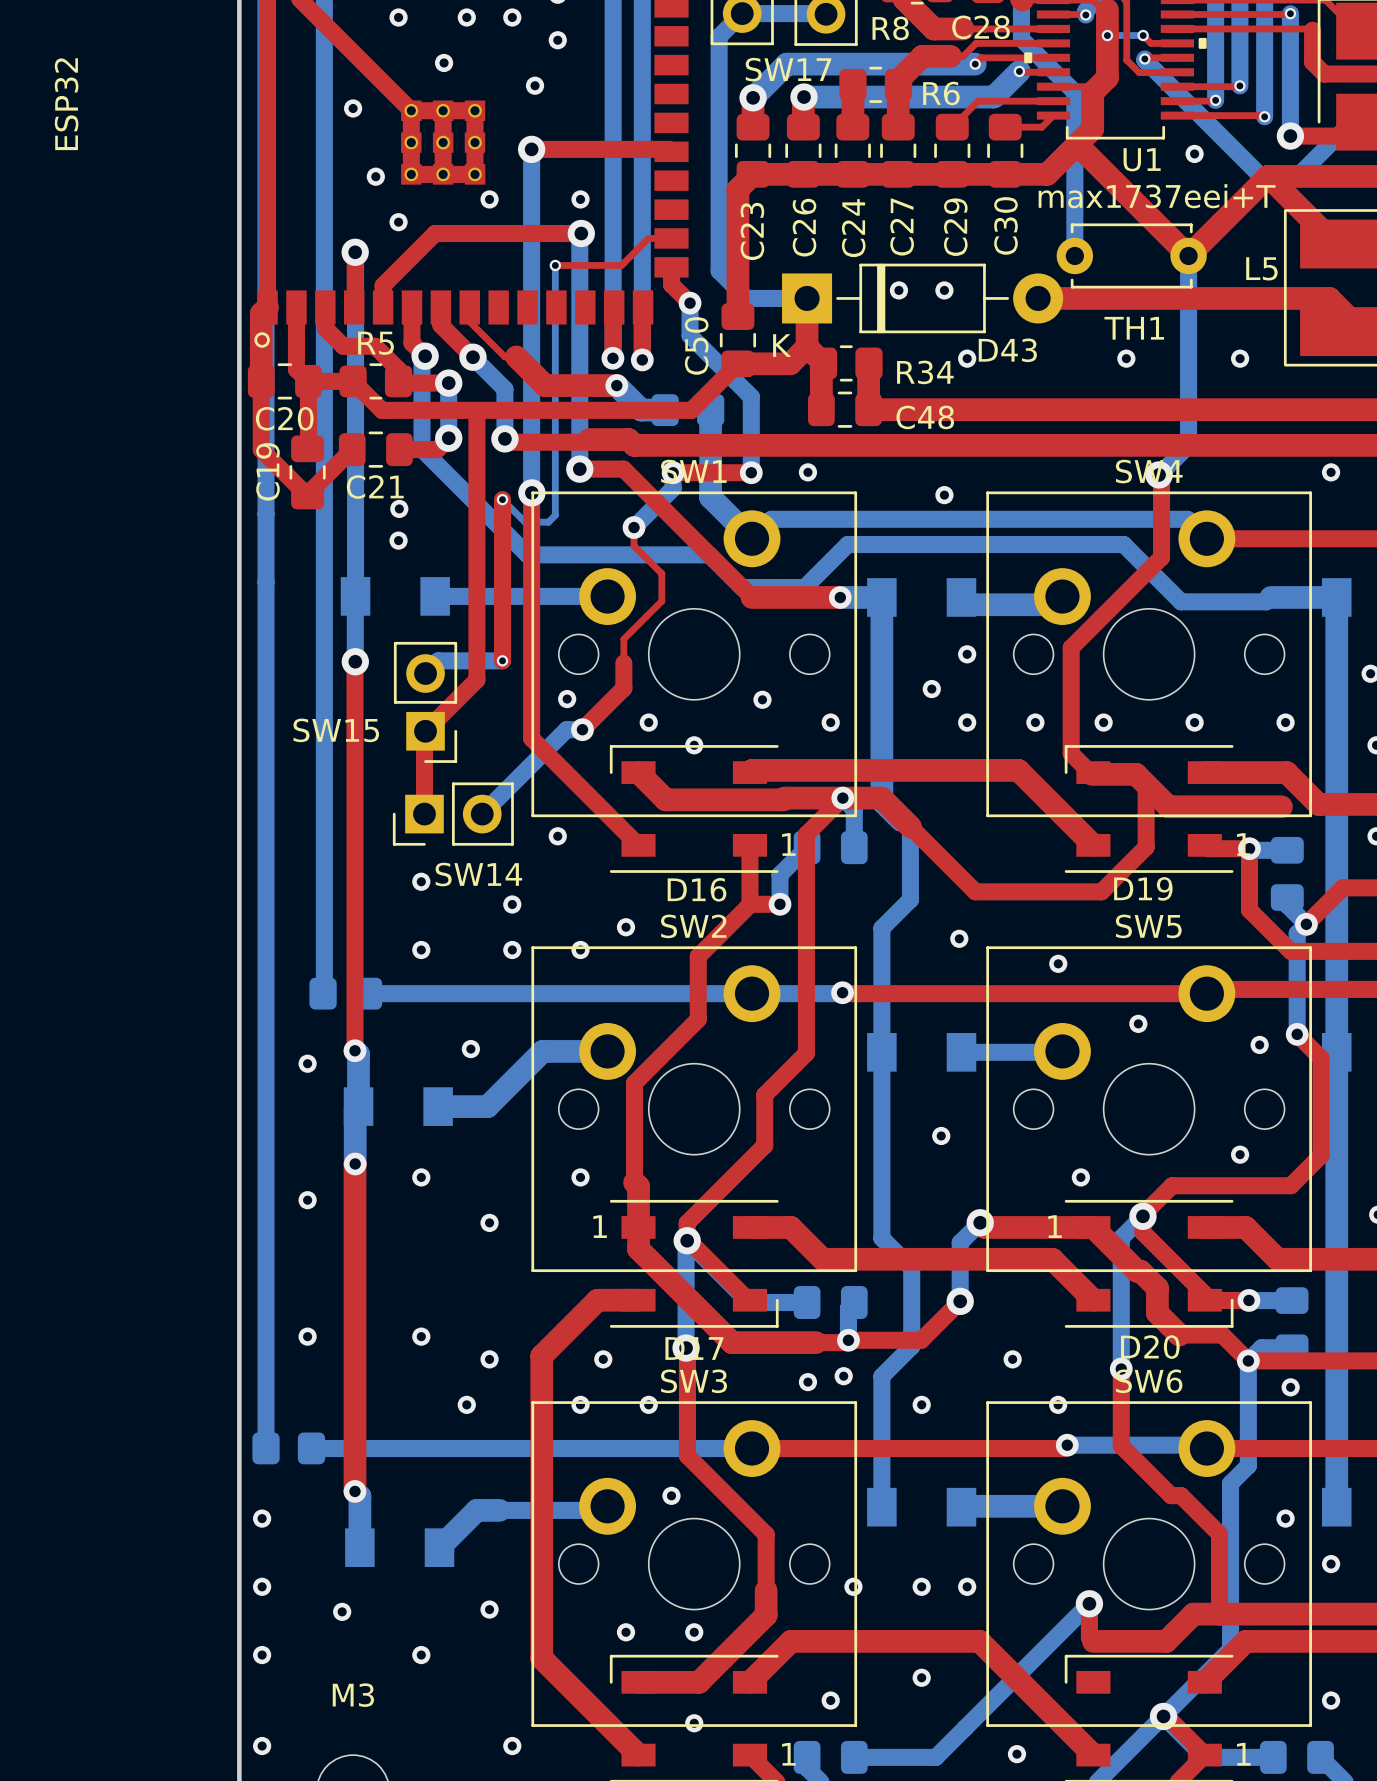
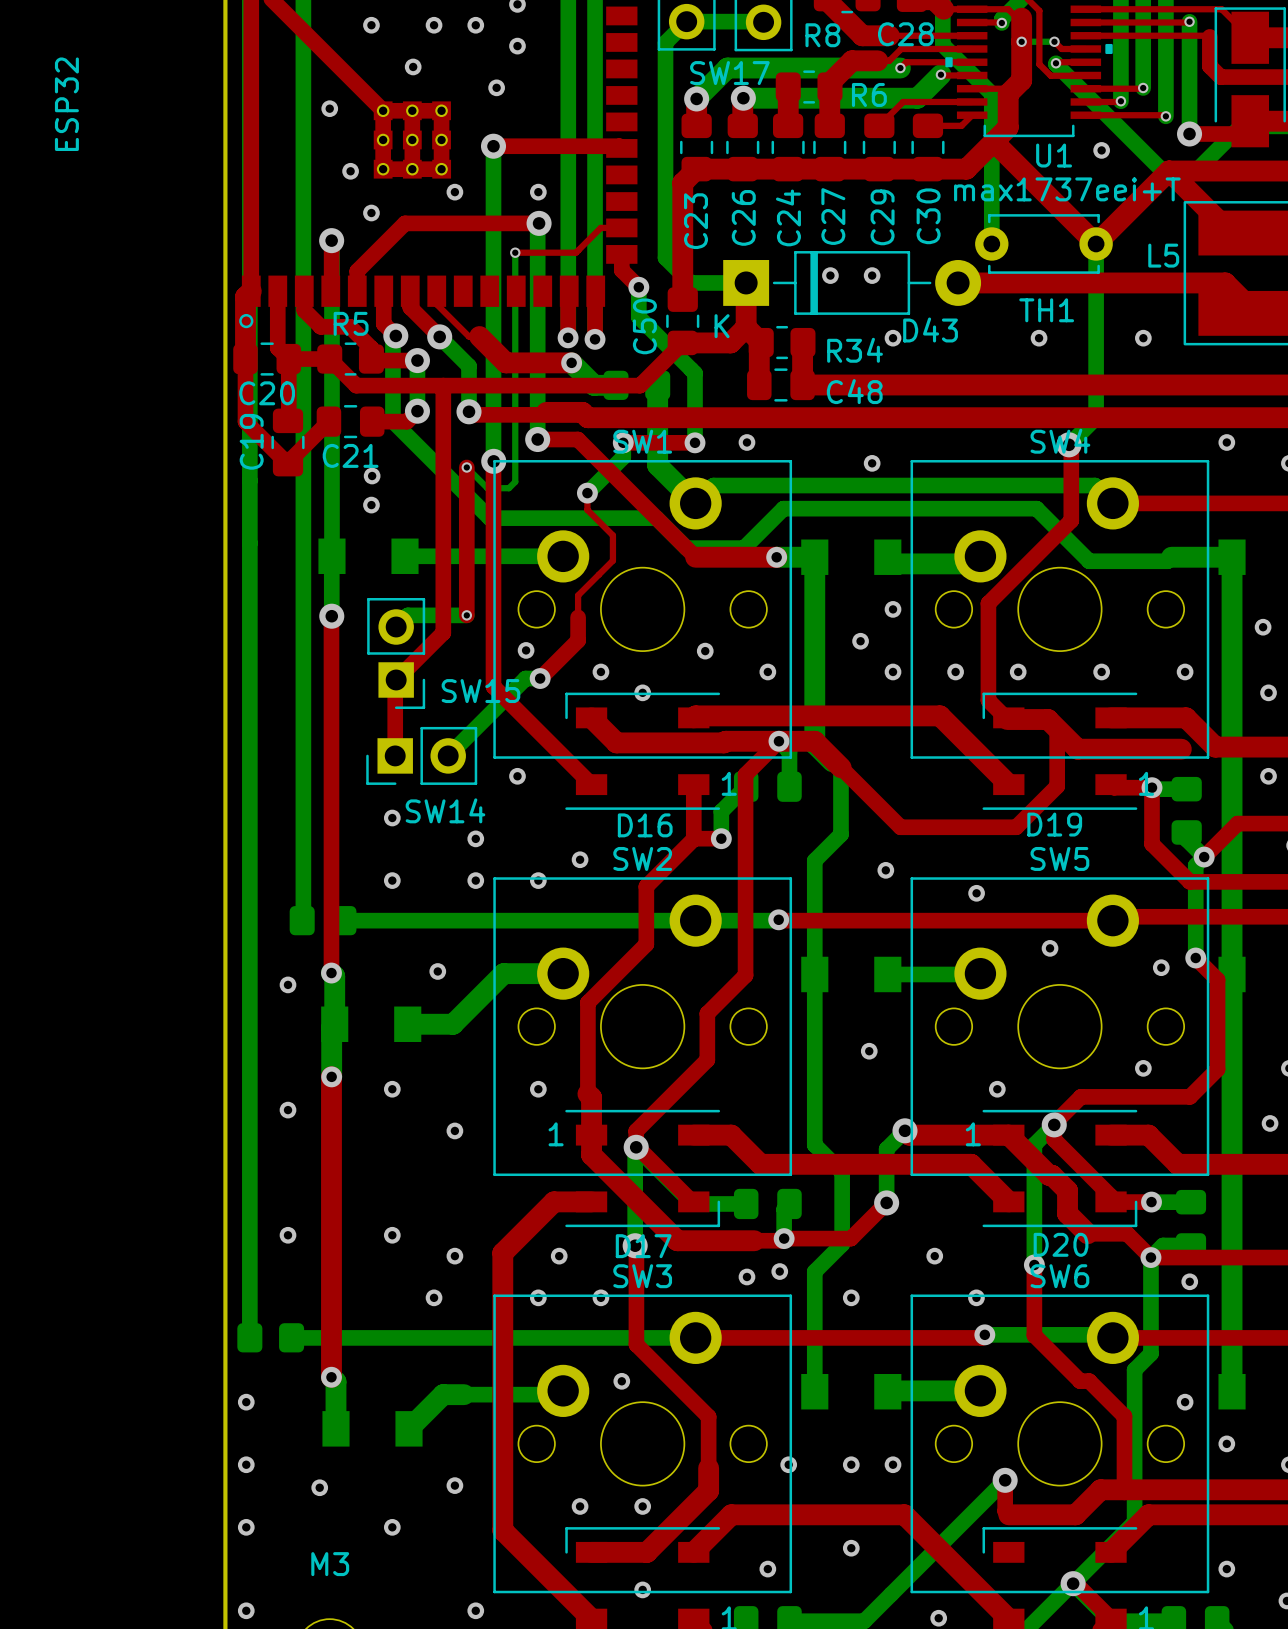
SW15 name position: SW15 (336, 730) -> SW15 (480, 691)

